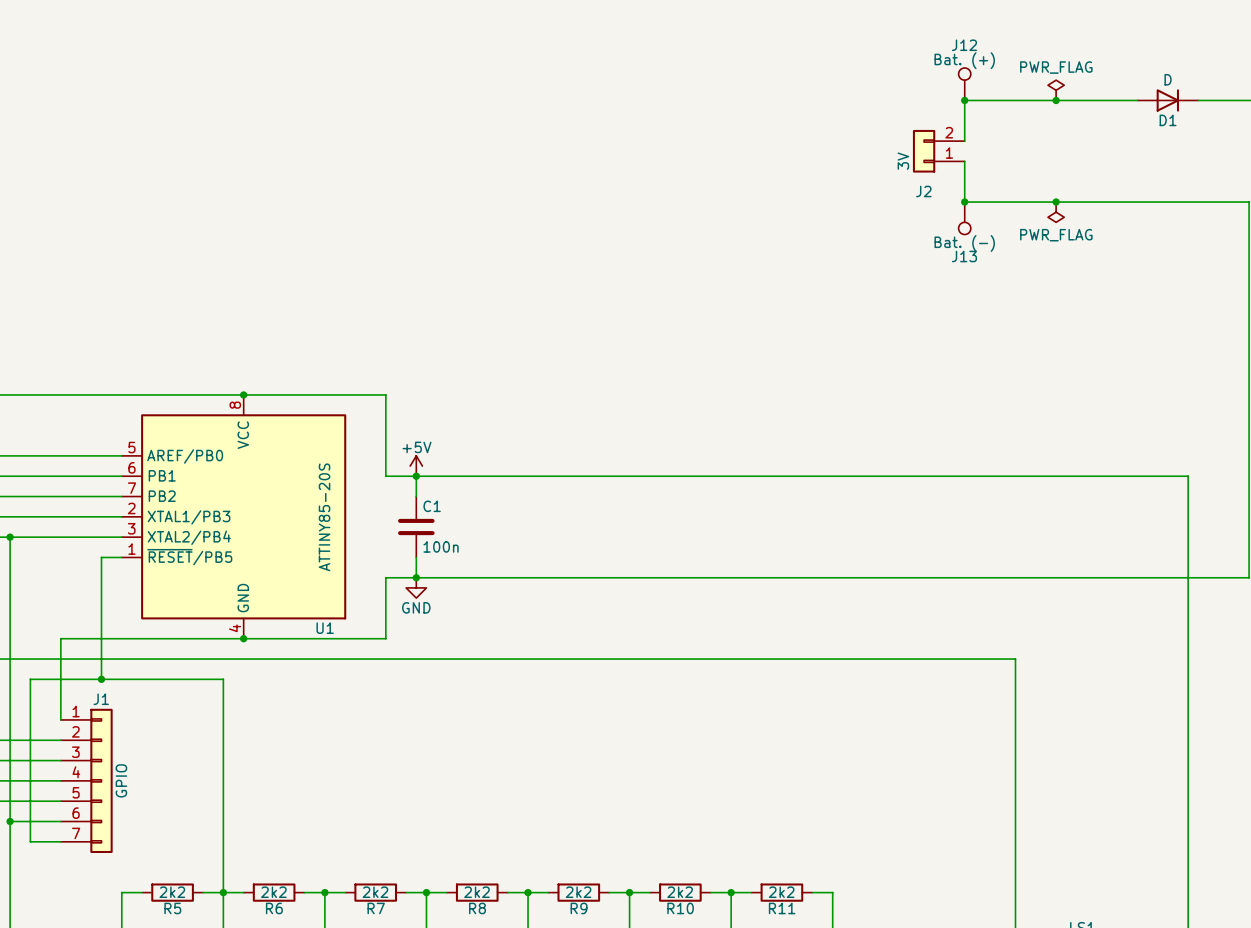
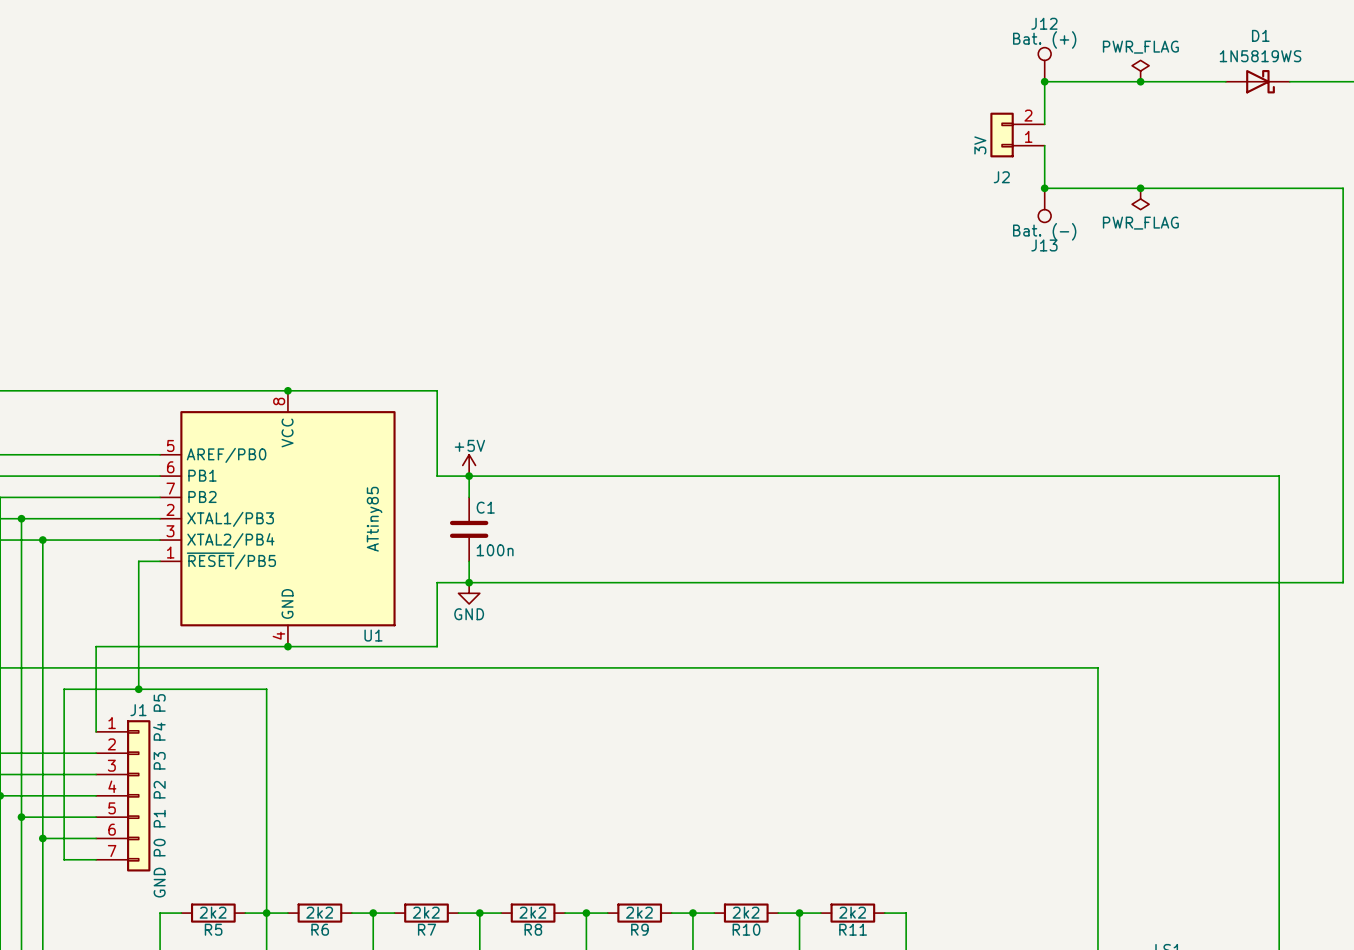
D1 value: D (1168, 79) -> 1N5819WS (1260, 56)
D1 symbol: [1137, 89, 1199, 112] -> [1225, 70, 1290, 94]
D1 name position: D1 (1168, 120) -> D1 (1260, 35)
U1 value: ATTINY85-20S (324, 517) -> ATtiny85 (374, 519)
J1 value: GPIO (121, 780) -> GND P0 P1 P2 P3 P4 P5 (159, 795)

